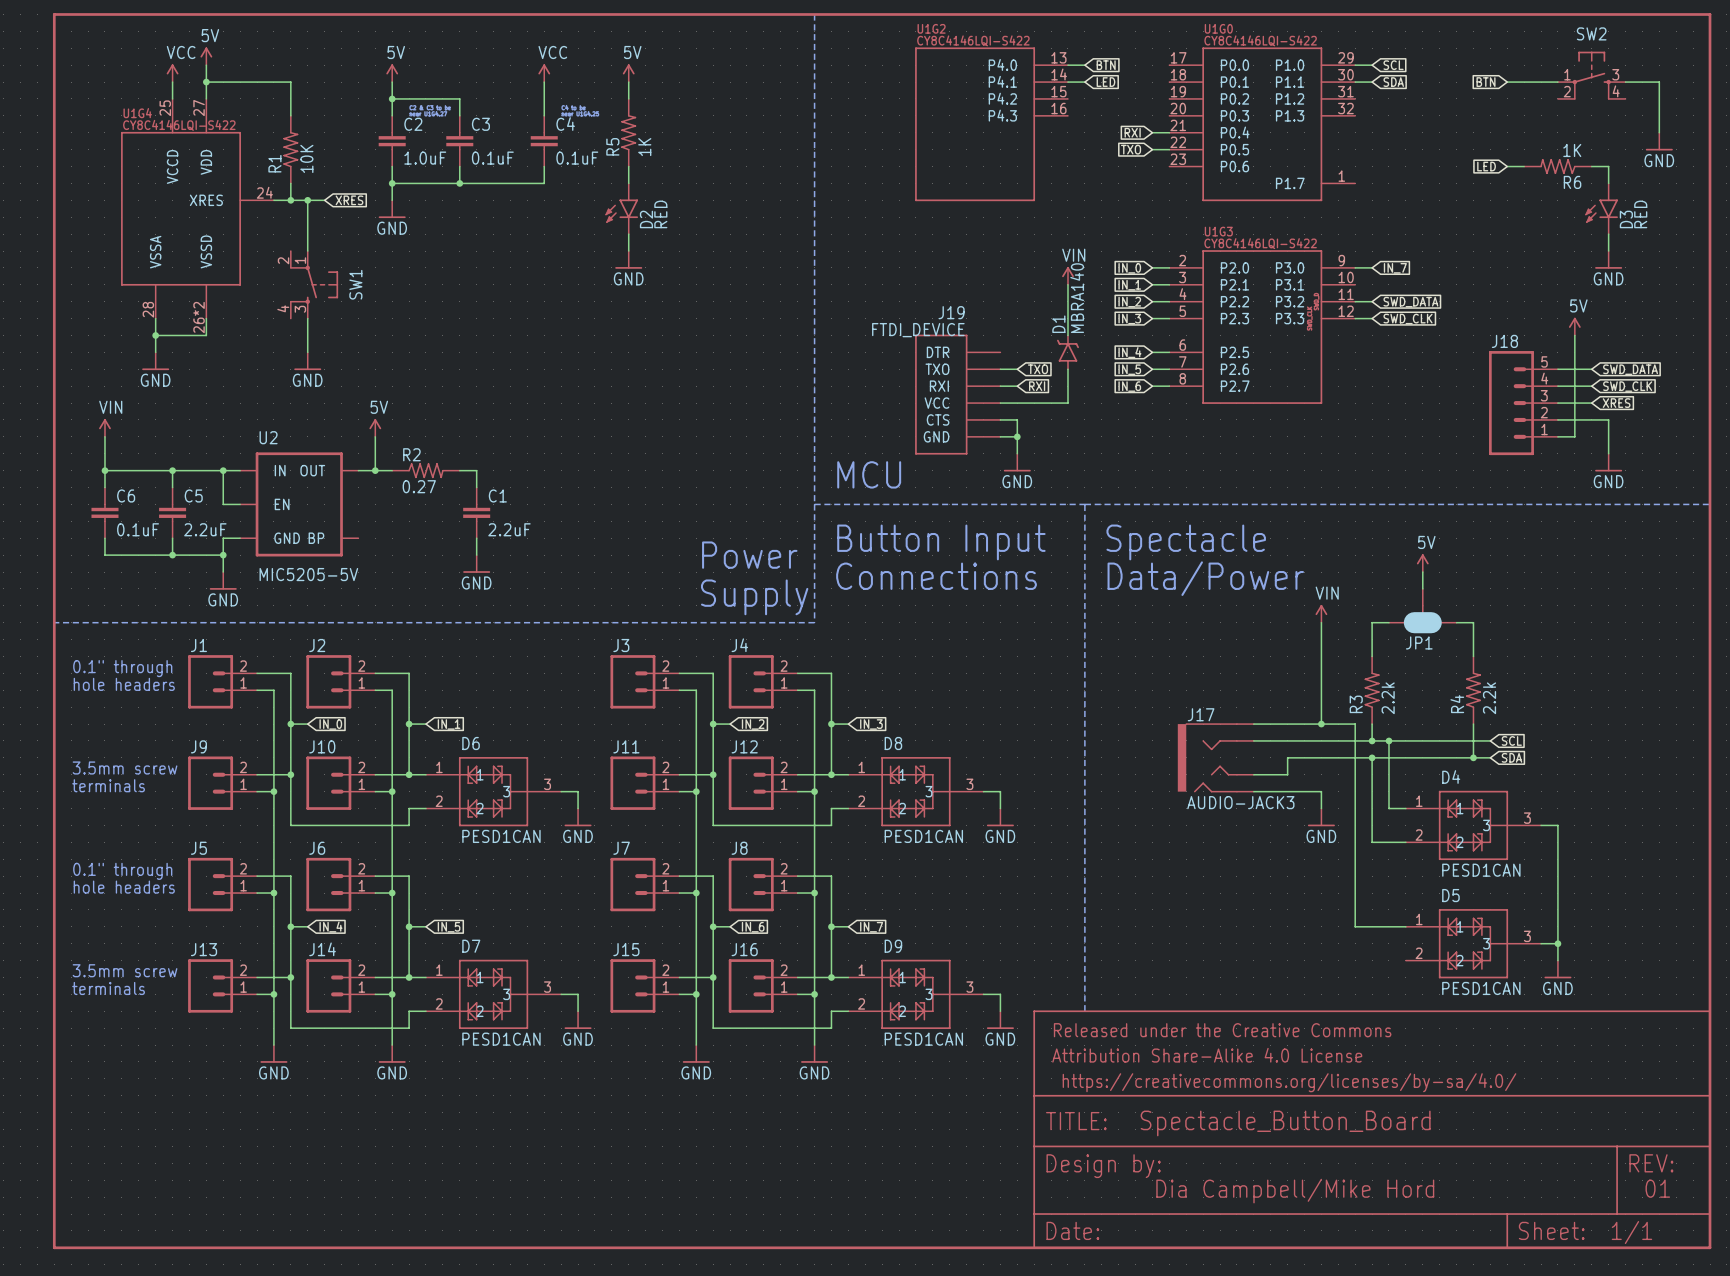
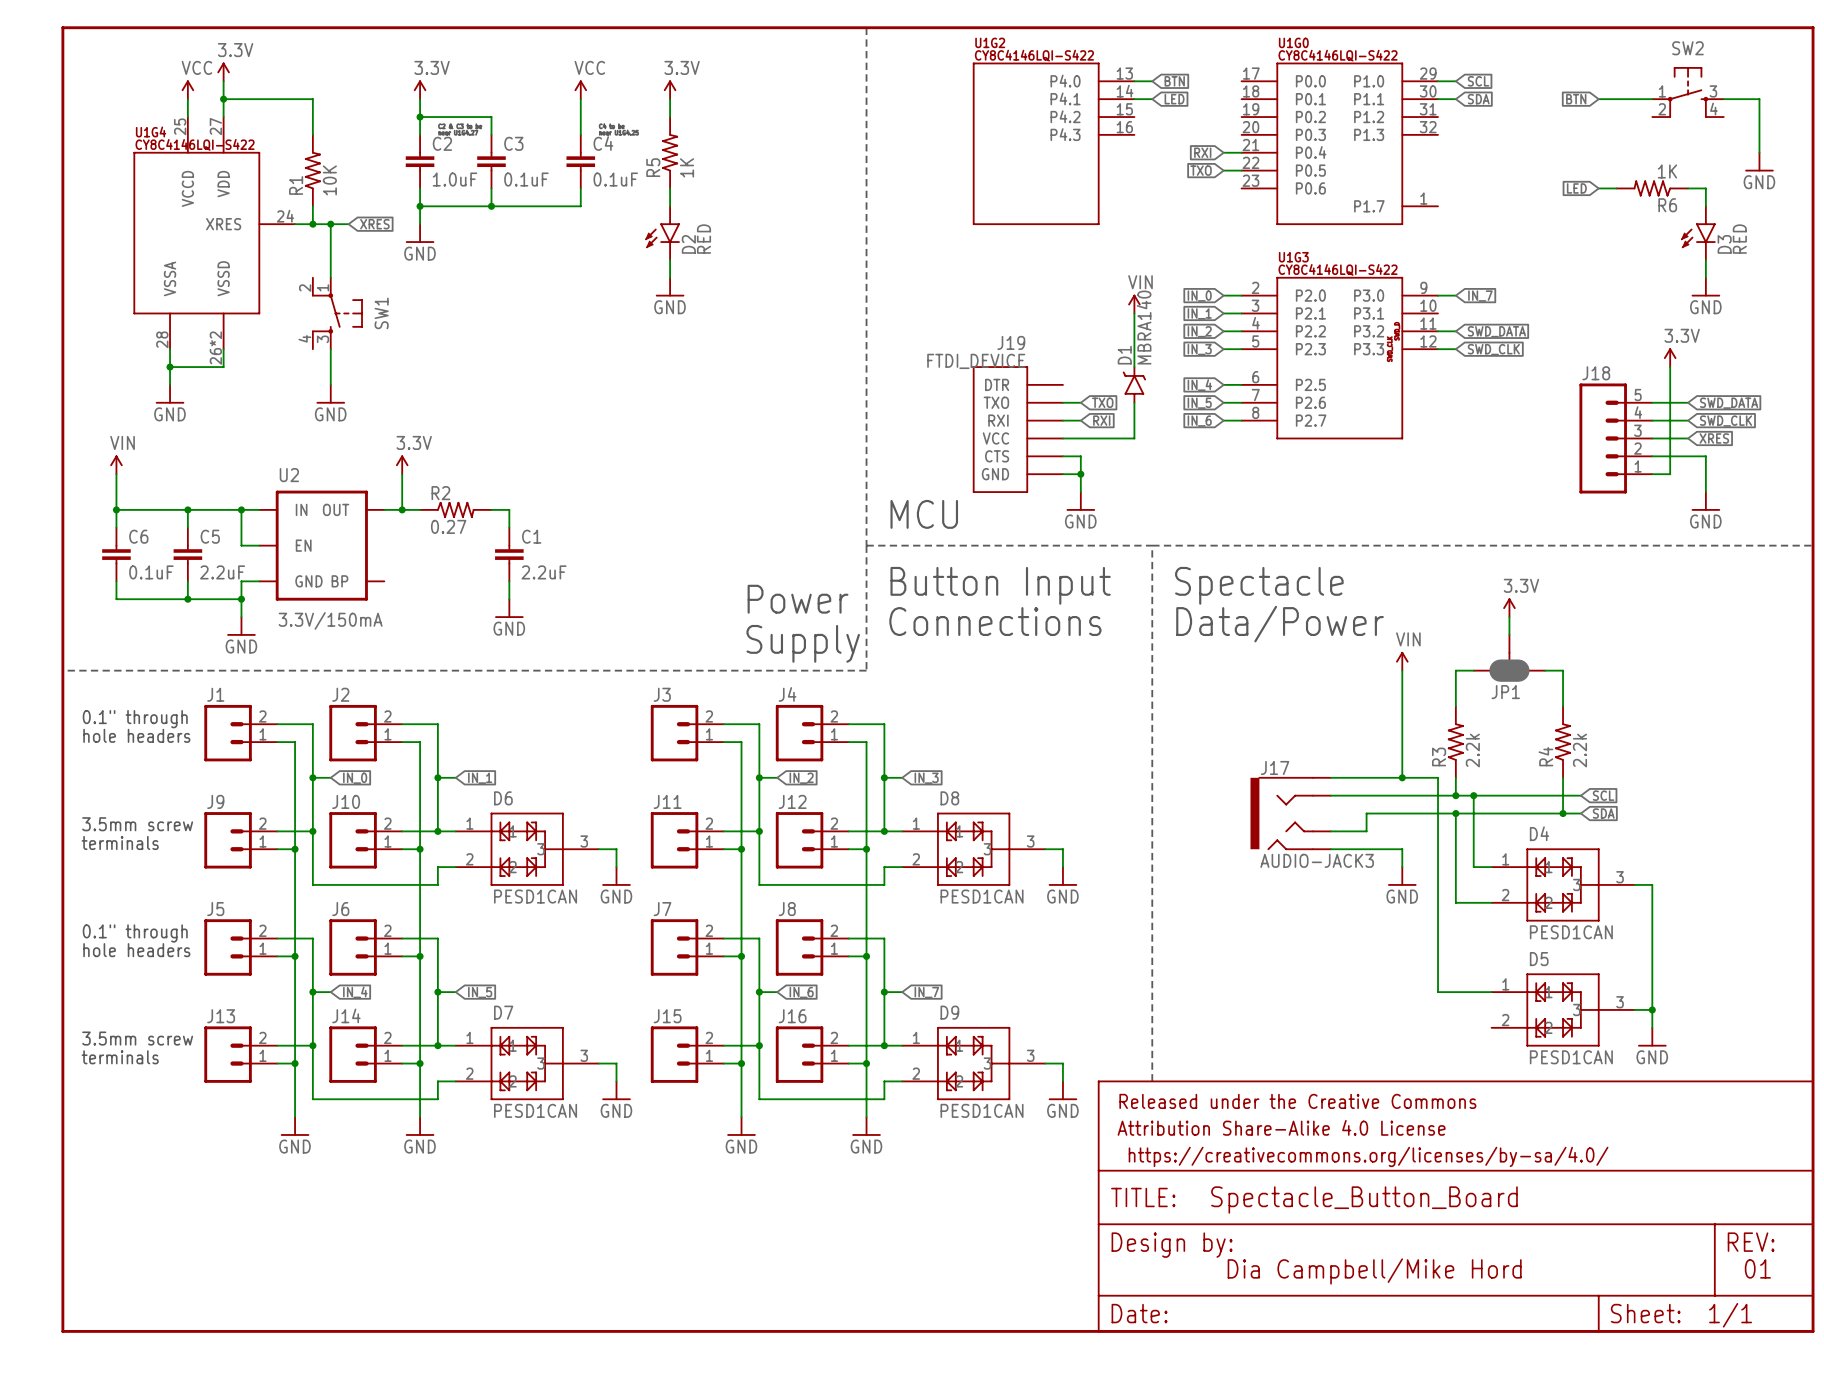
power symbol: 5V (206, 56) -> 3.3V (223, 71)
power symbol: 5V (392, 73) -> 3.3V (420, 89)
power symbol: 5V (628, 73) -> 3.3V (670, 89)
power symbol: 5V (1574, 326) -> 3.3V (1670, 357)
power symbol: 5V (375, 427) -> 3.3V (402, 464)
power symbol: 5V (1422, 563) -> 3.3V (1509, 607)
U2 value: MIC5205-5V (308, 574) -> 3.3V/150mA (330, 620)

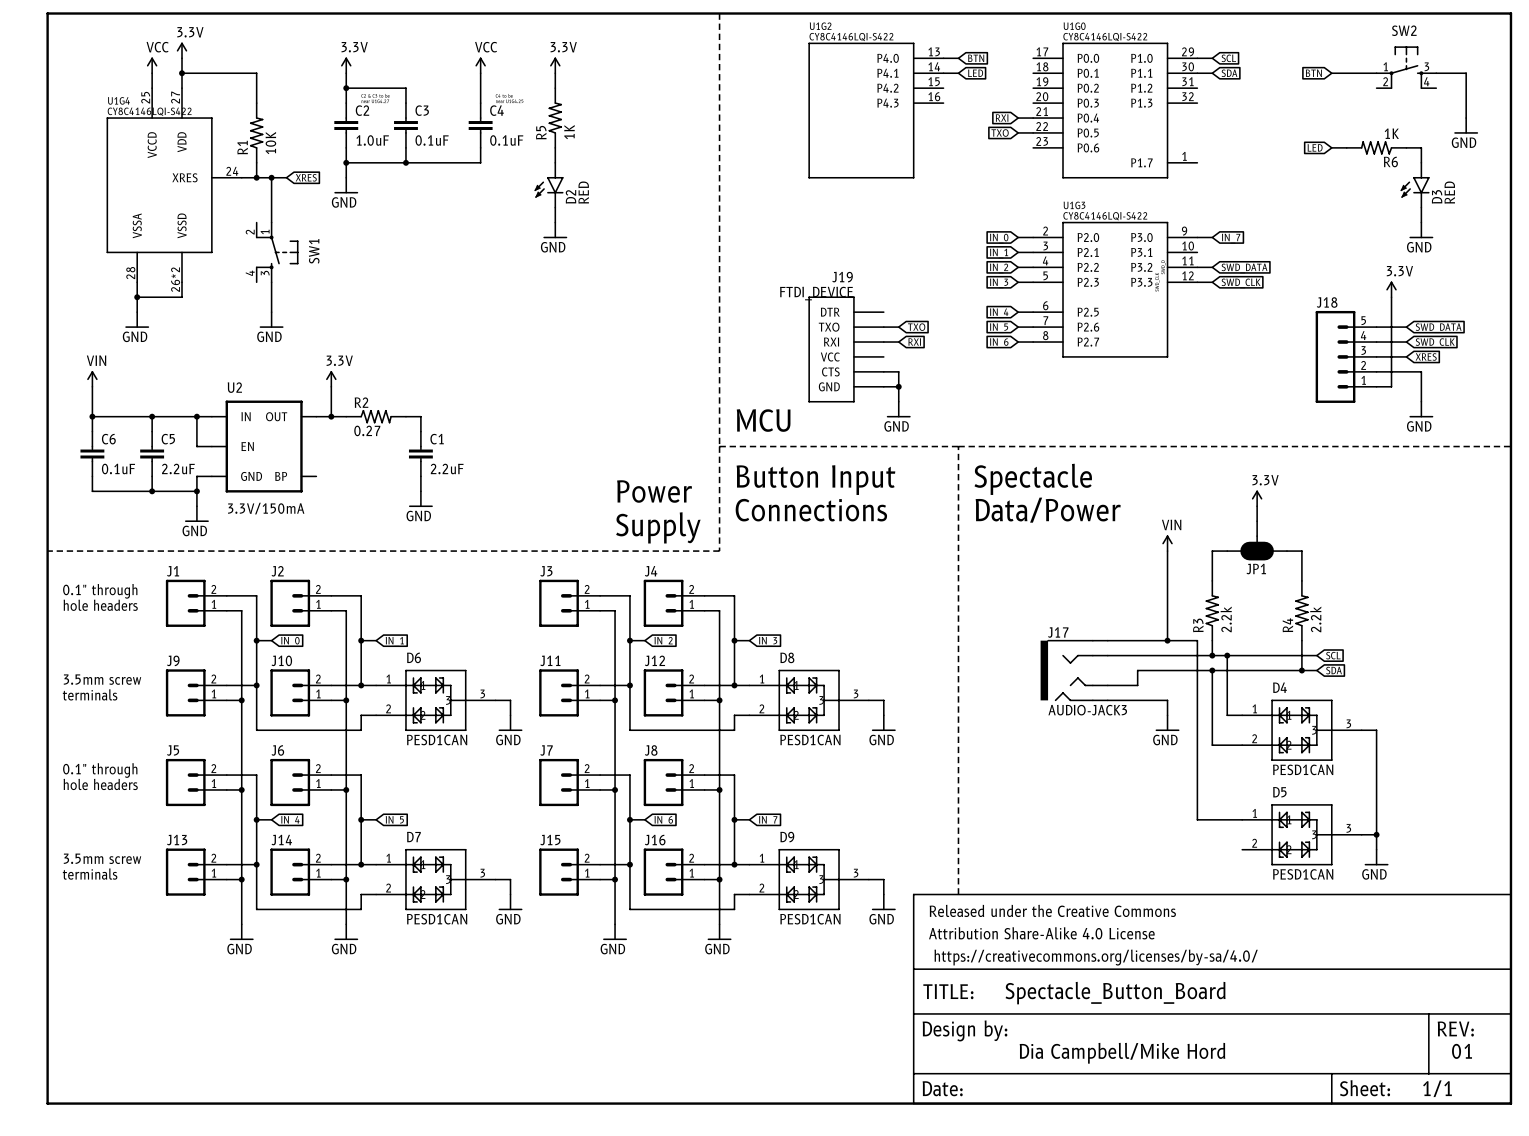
power symbol: VIN (1134, 304) -> none
wire: (1134, 313) (1134, 367) -> none
D1: MBRA140 (1134, 384) -> none
wire: (1134, 402) (1134, 438) (1062, 438) -> none

